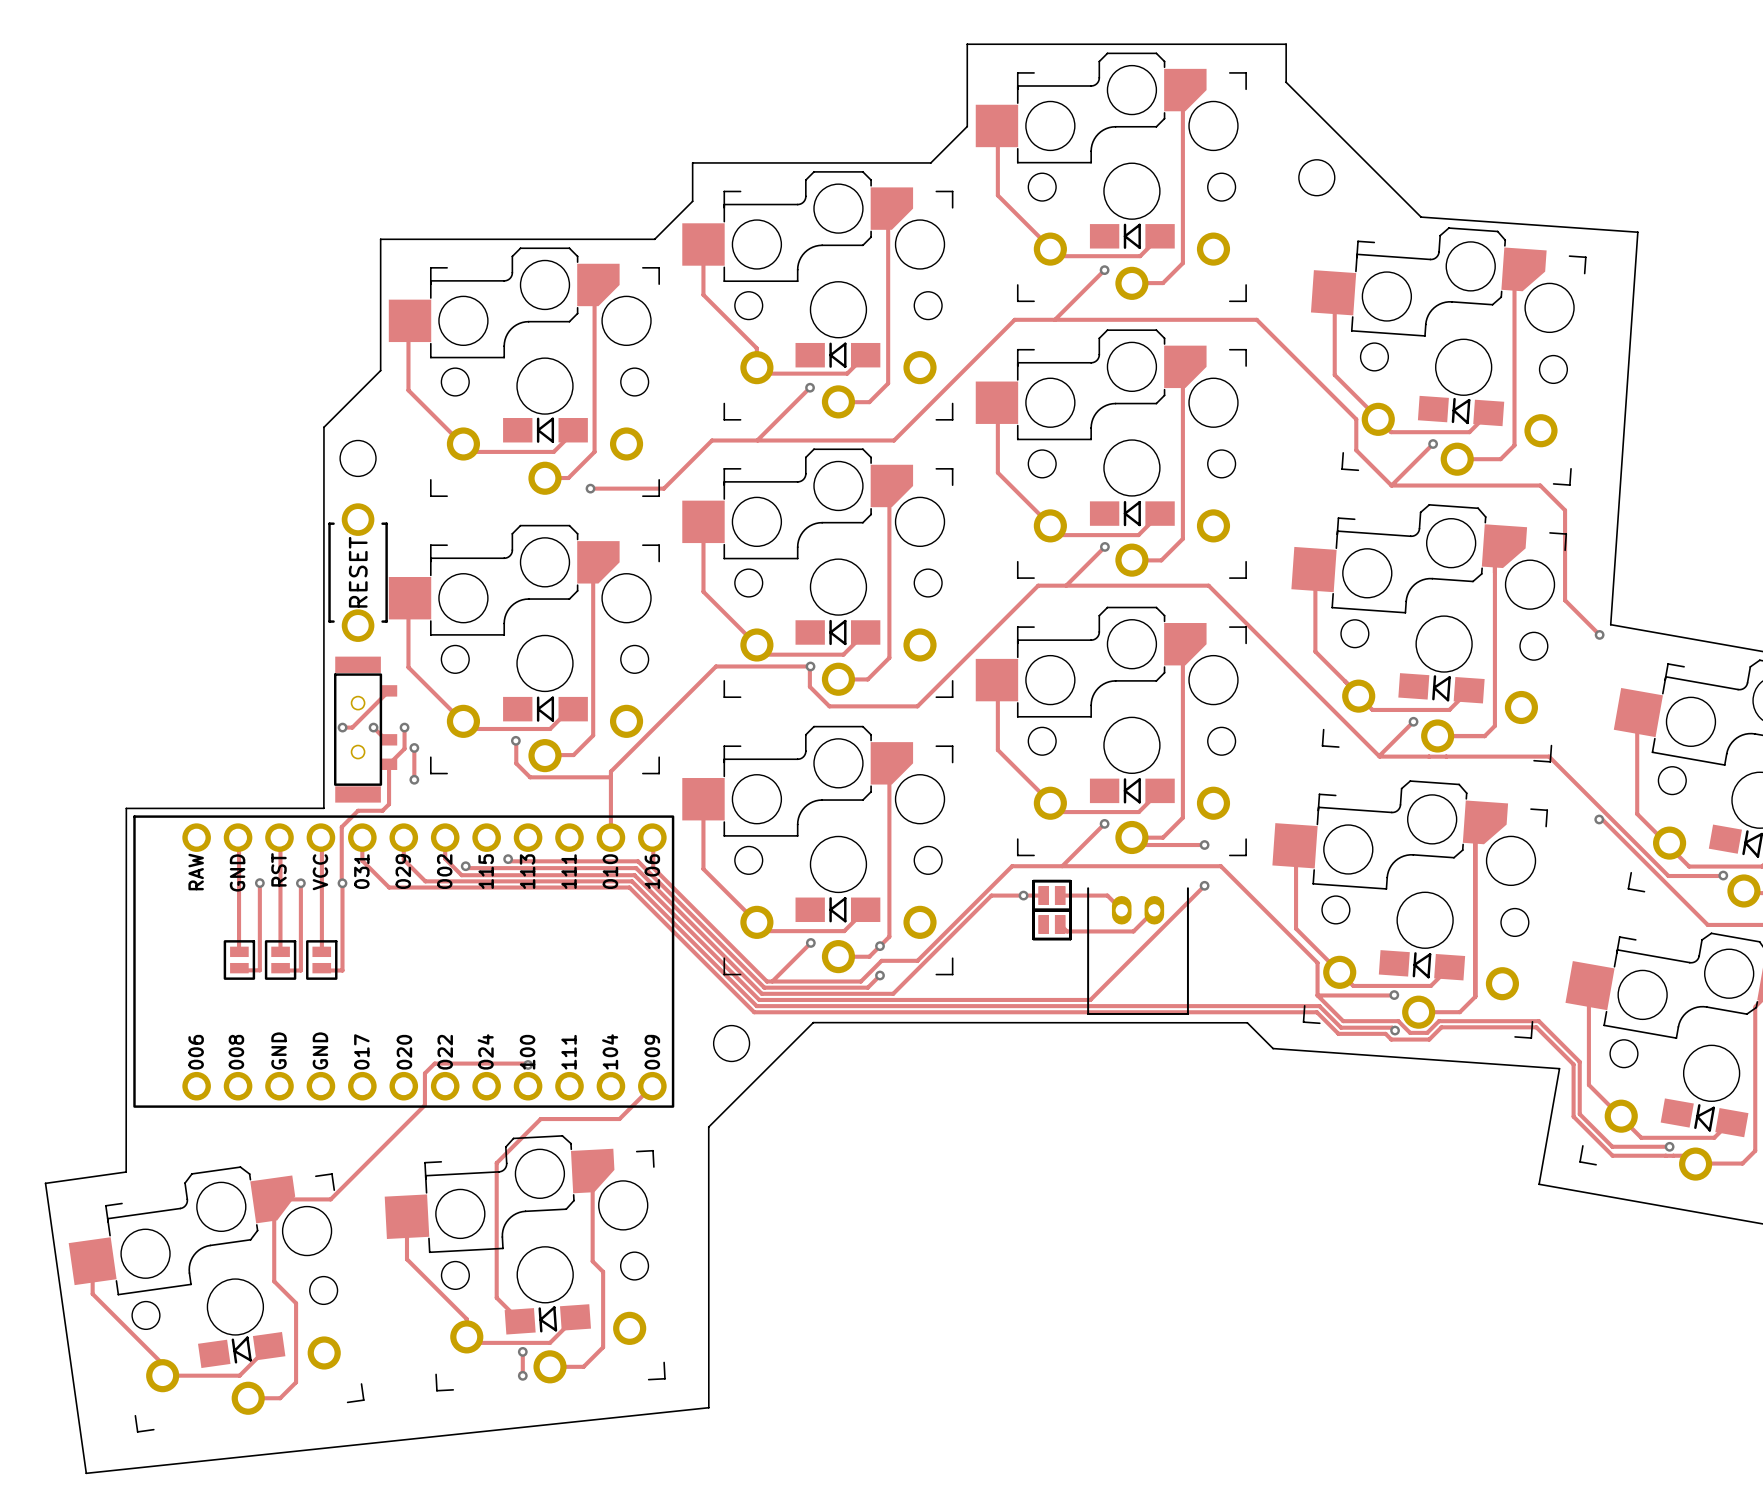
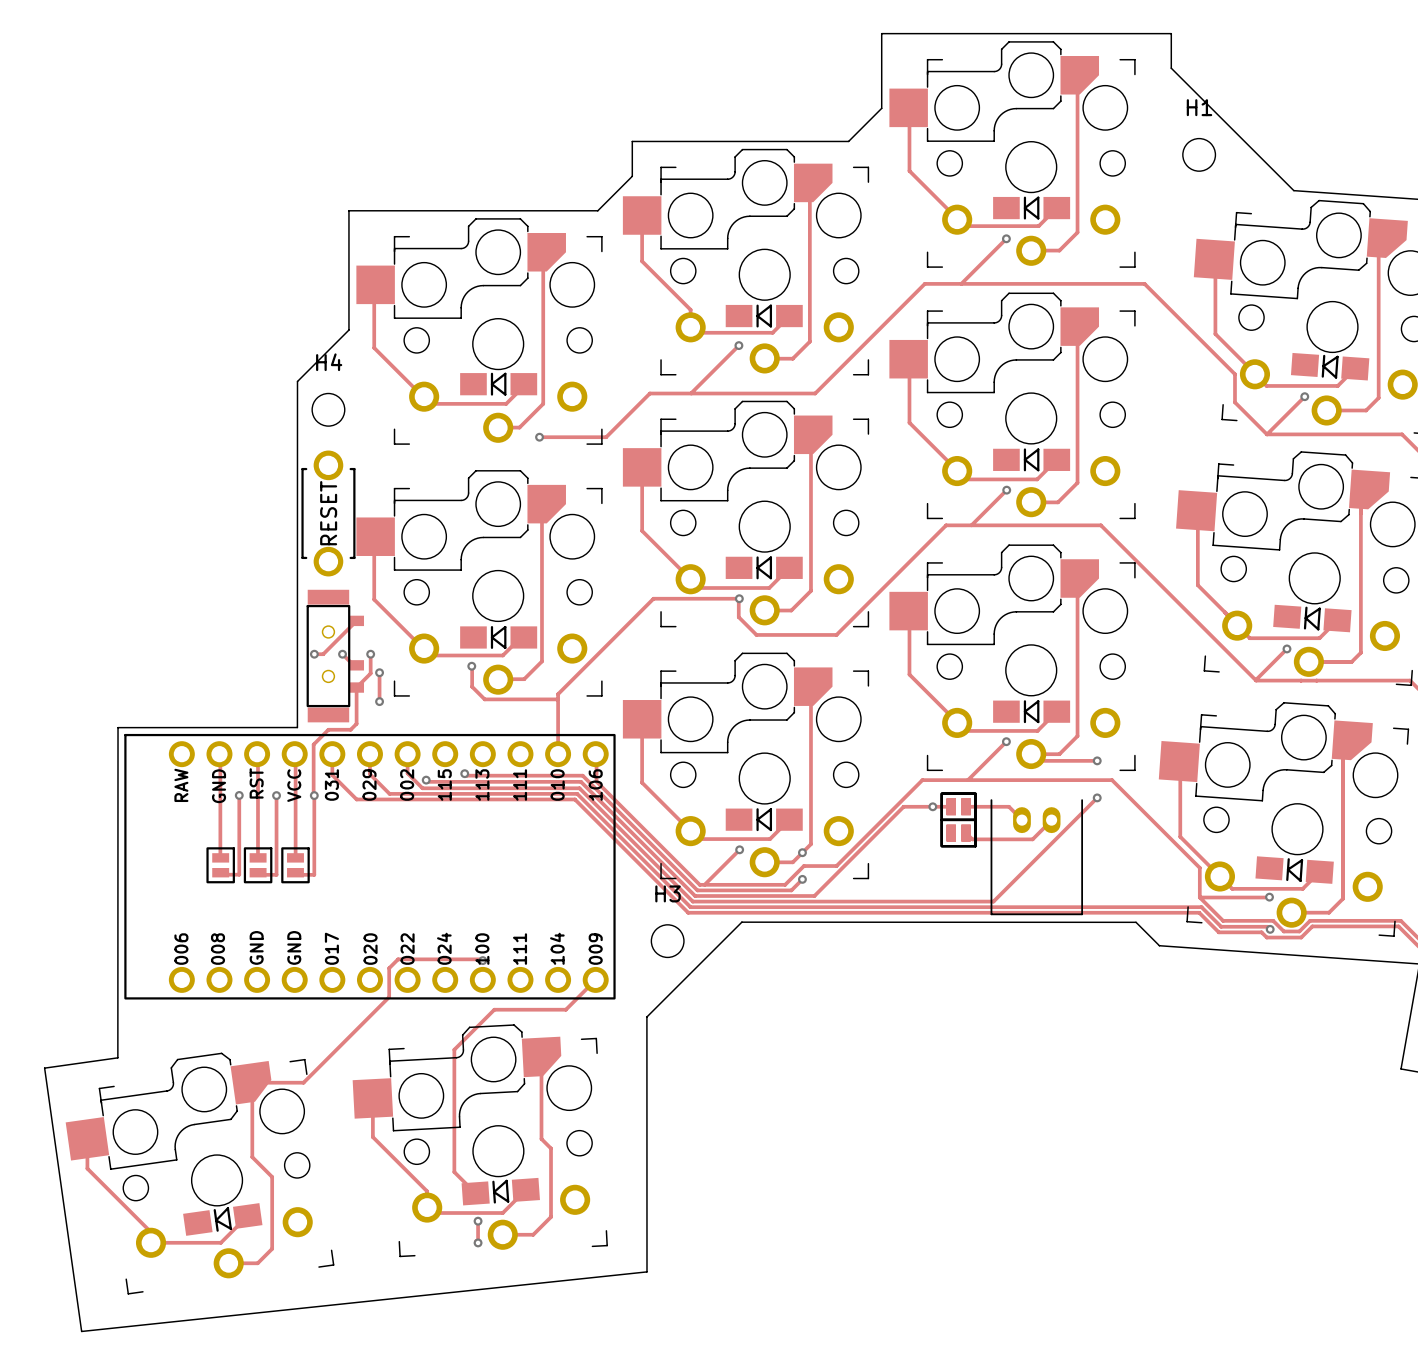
H1 name: none -> H1 (1199, 107)
H4 name: none -> H4 (329, 362)
H3 name: none -> H3 (668, 893)

